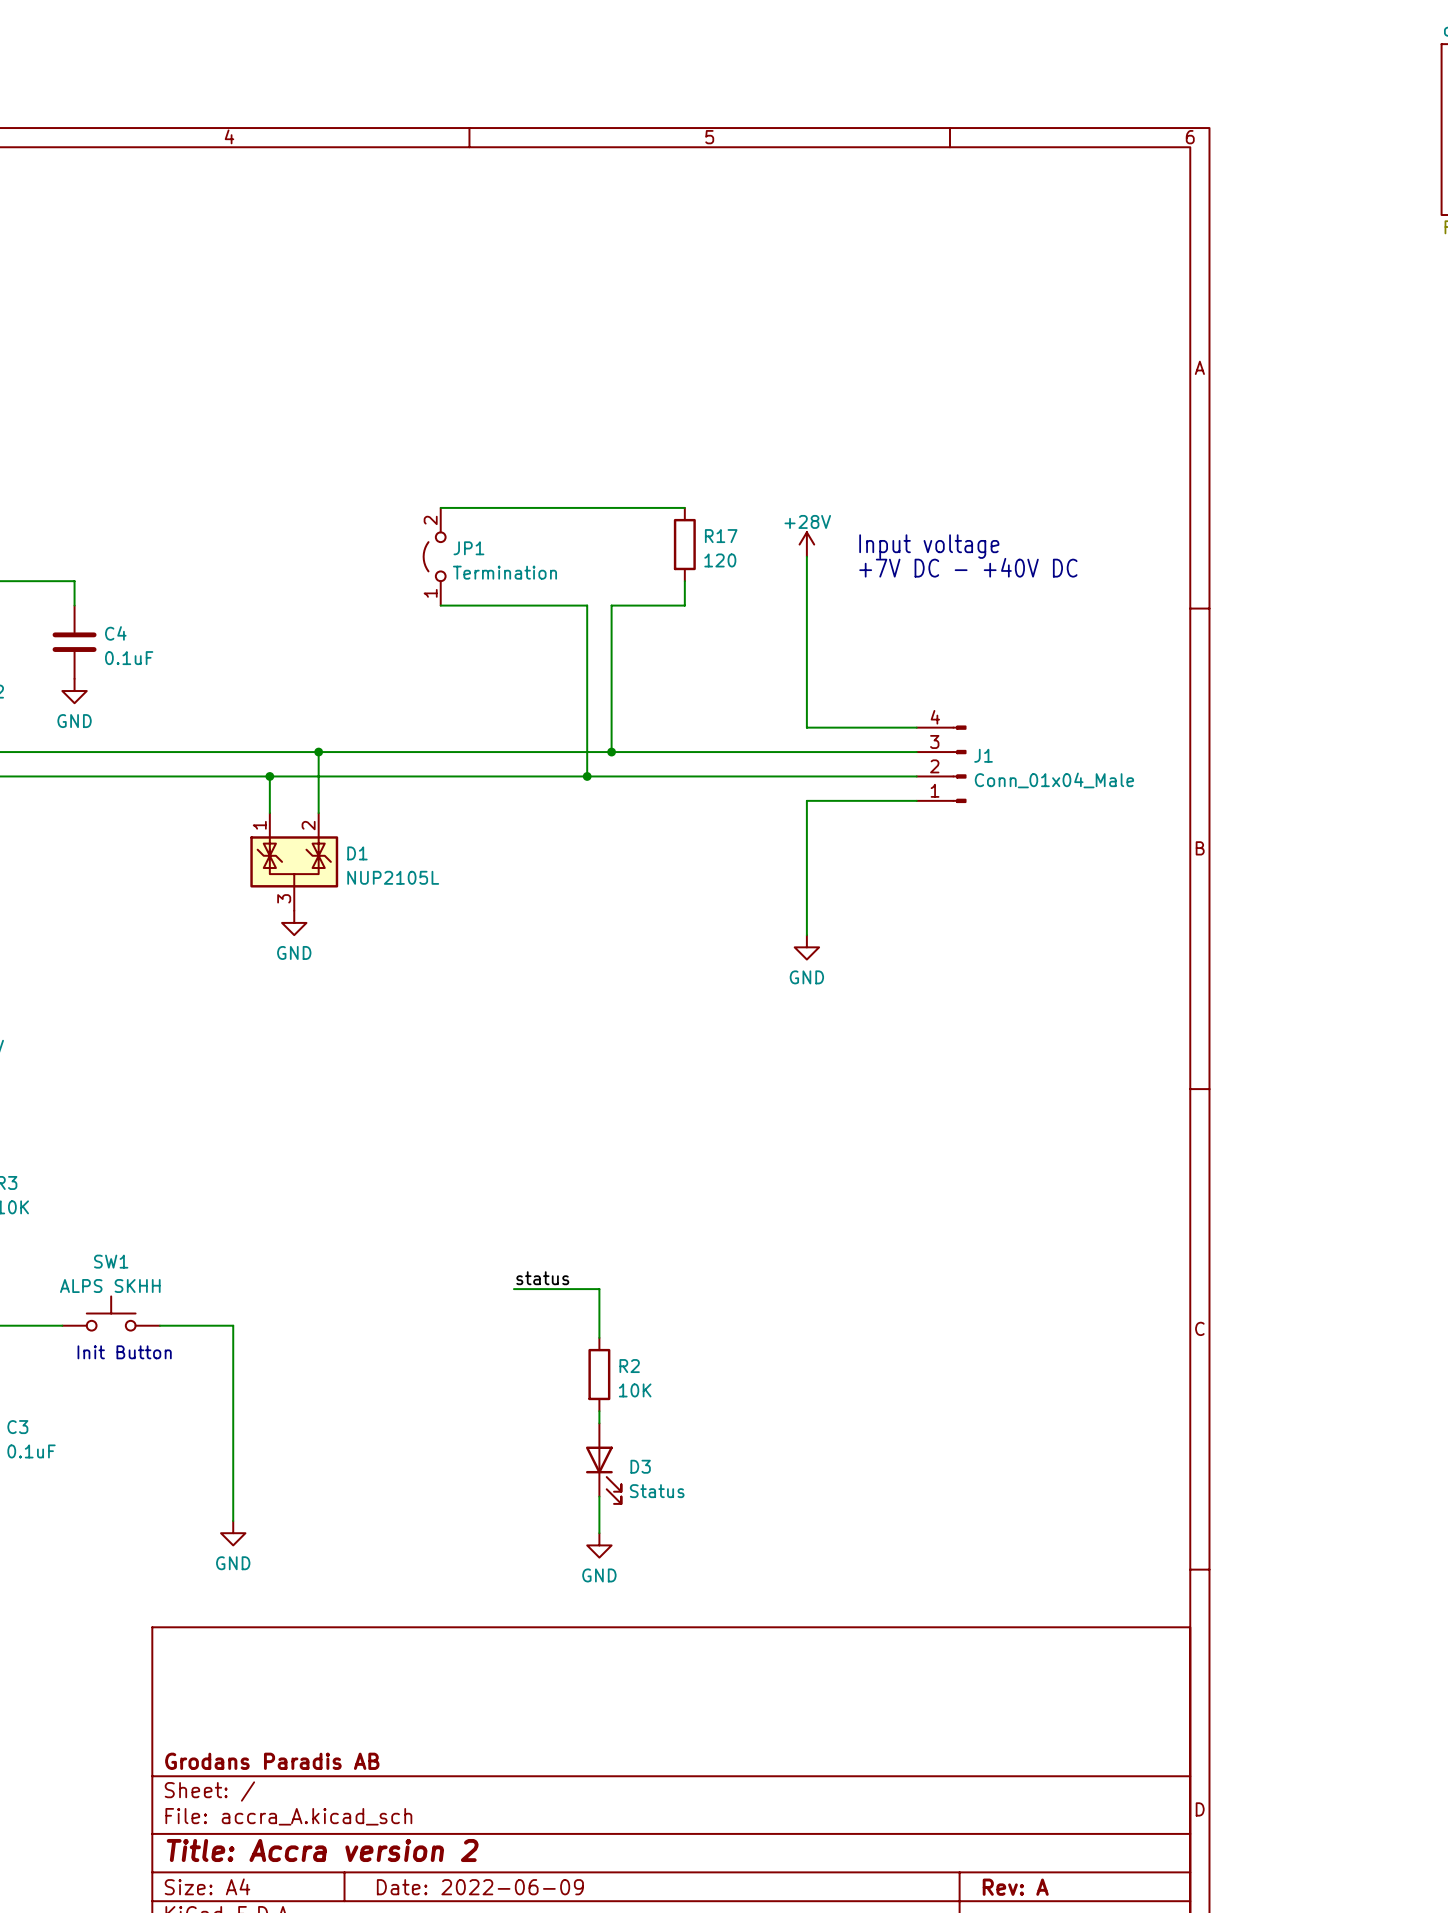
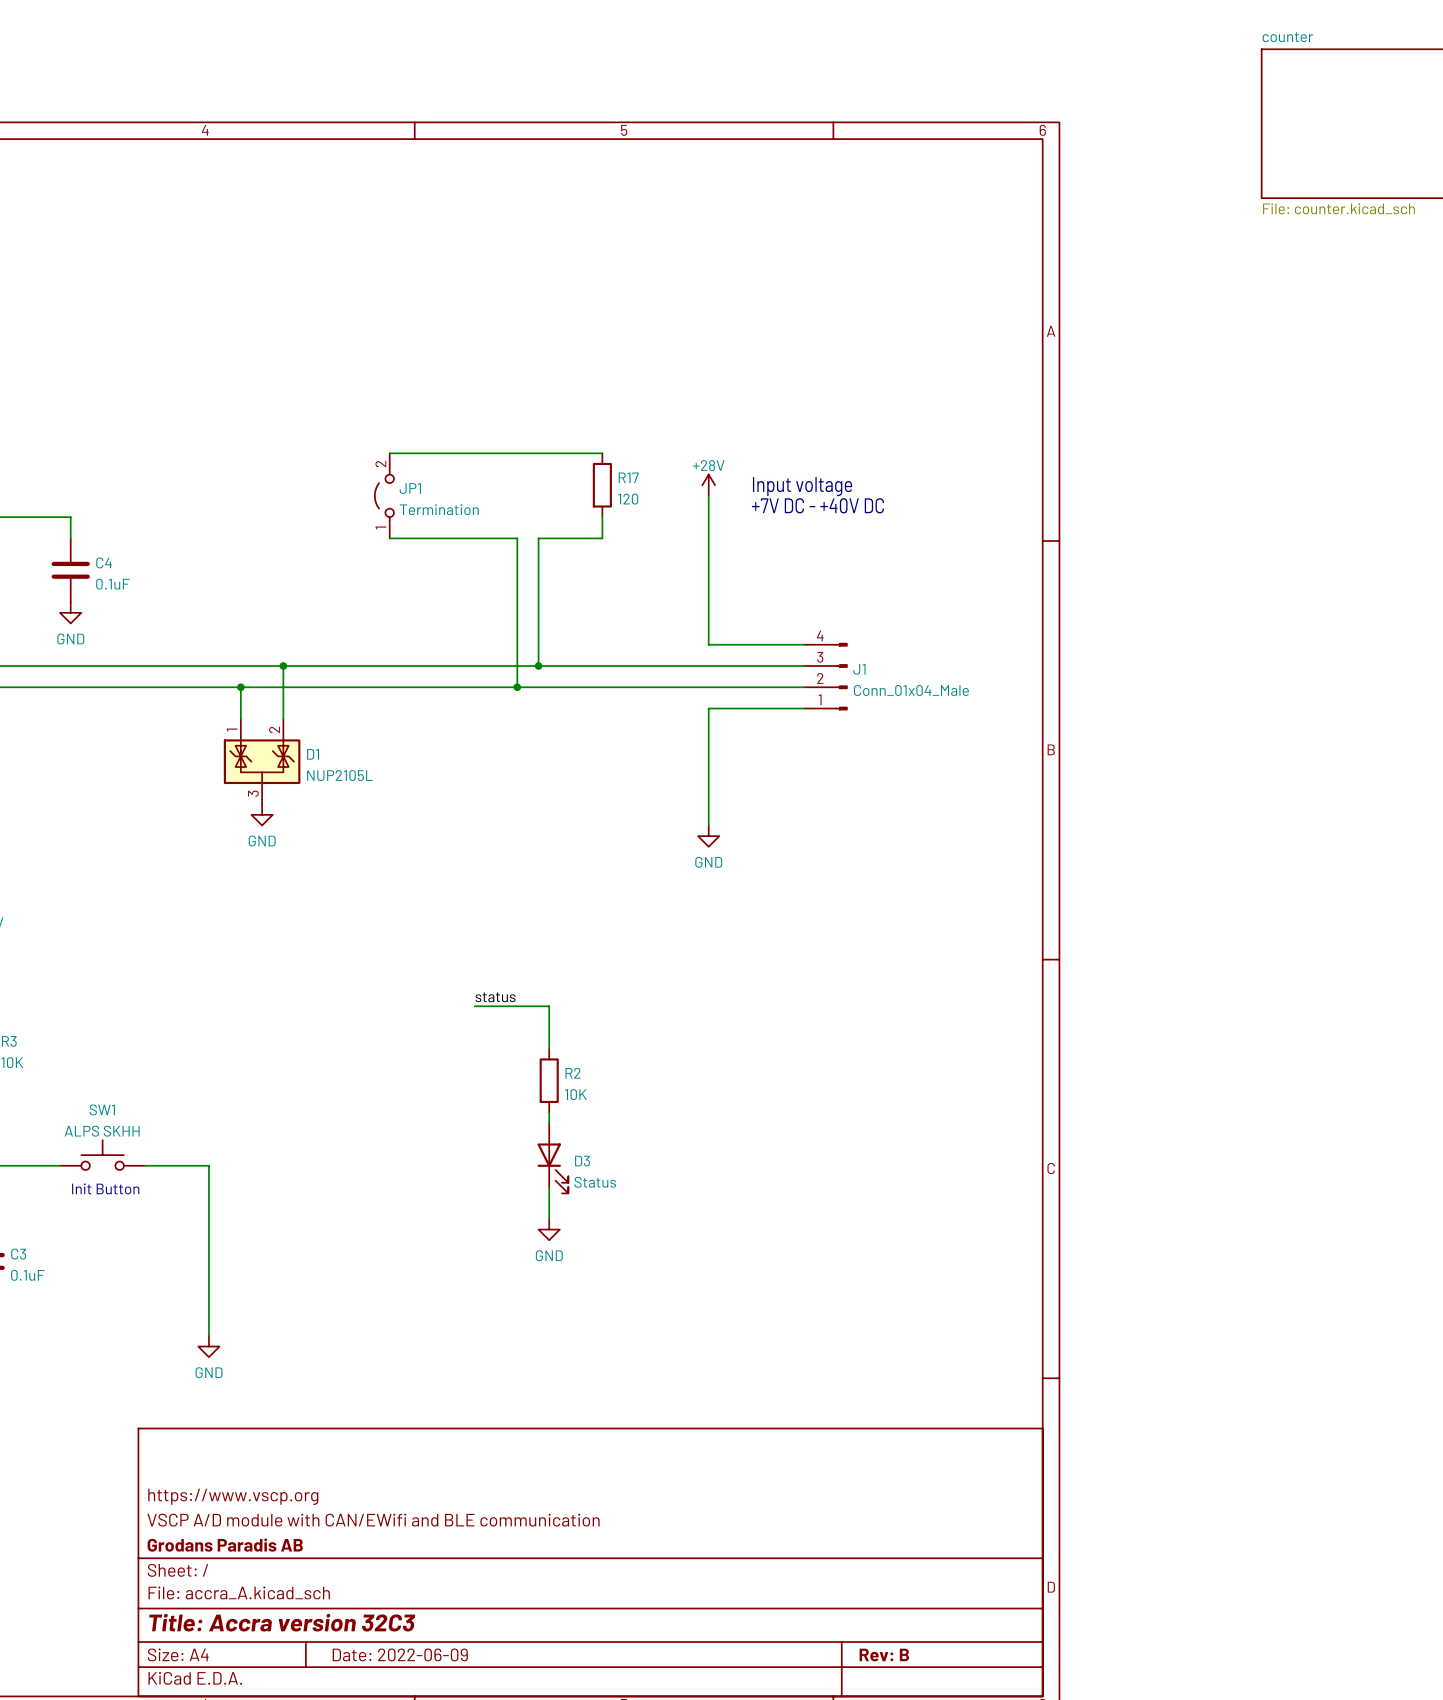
label position: status (542, 1278) -> status (495, 997)
wire: (513, 1289) (599, 1289) (599, 1337) -> (474, 1006) (549, 1006) (549, 1048)
R2 position: (599, 1374) -> (549, 1080)
wire: (599, 1411) (599, 1423) -> (549, 1112) (549, 1123)
D3 position: (603, 1463) -> (552, 1158)
wire: (599, 1496) (599, 1533) -> (549, 1187) (549, 1218)
power symbol position: GND (599, 1545) -> GND (549, 1229)
title block: none -> https://www.vscp.org (233, 1496)
title block: none -> VSCP A/D module with CAN/EWifi and BLE communication (373, 1520)
title block: Title: Accra version 2 (322, 1850) -> Title: Accra version 32C3 (282, 1622)
title block: Rev: A (1015, 1887) -> Rev: B (884, 1655)

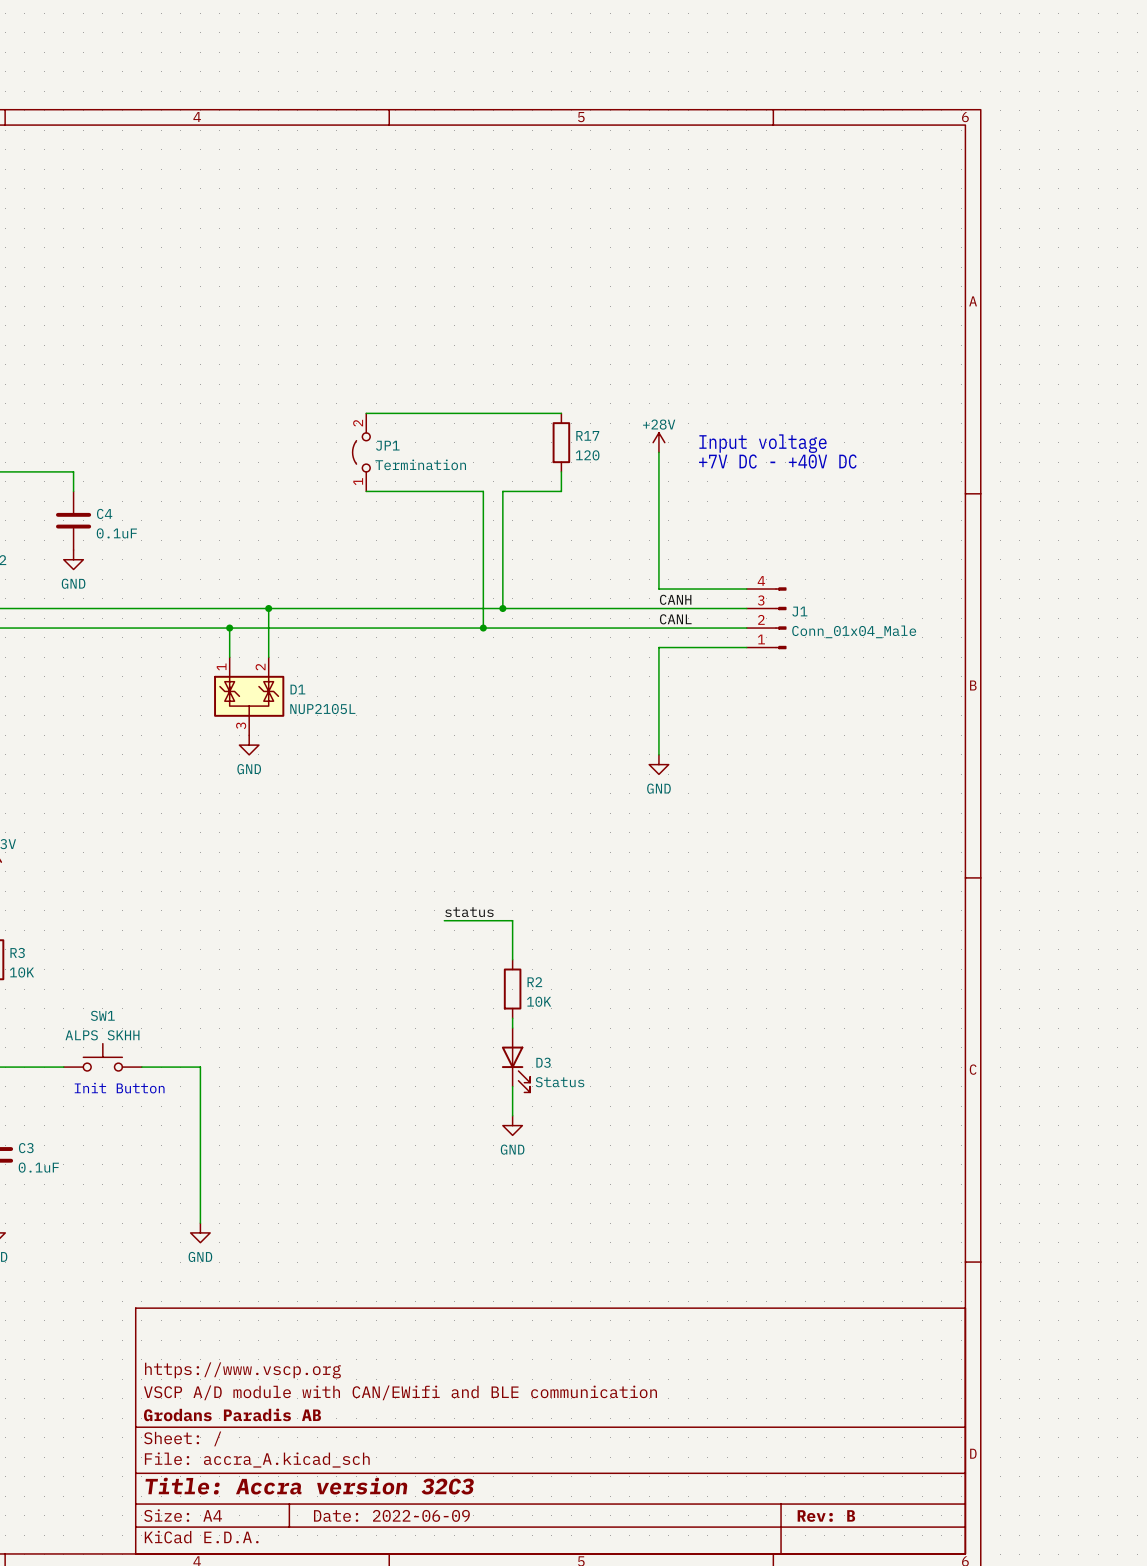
label: none -> CANH (675, 599)
label: none -> CANL (675, 619)

